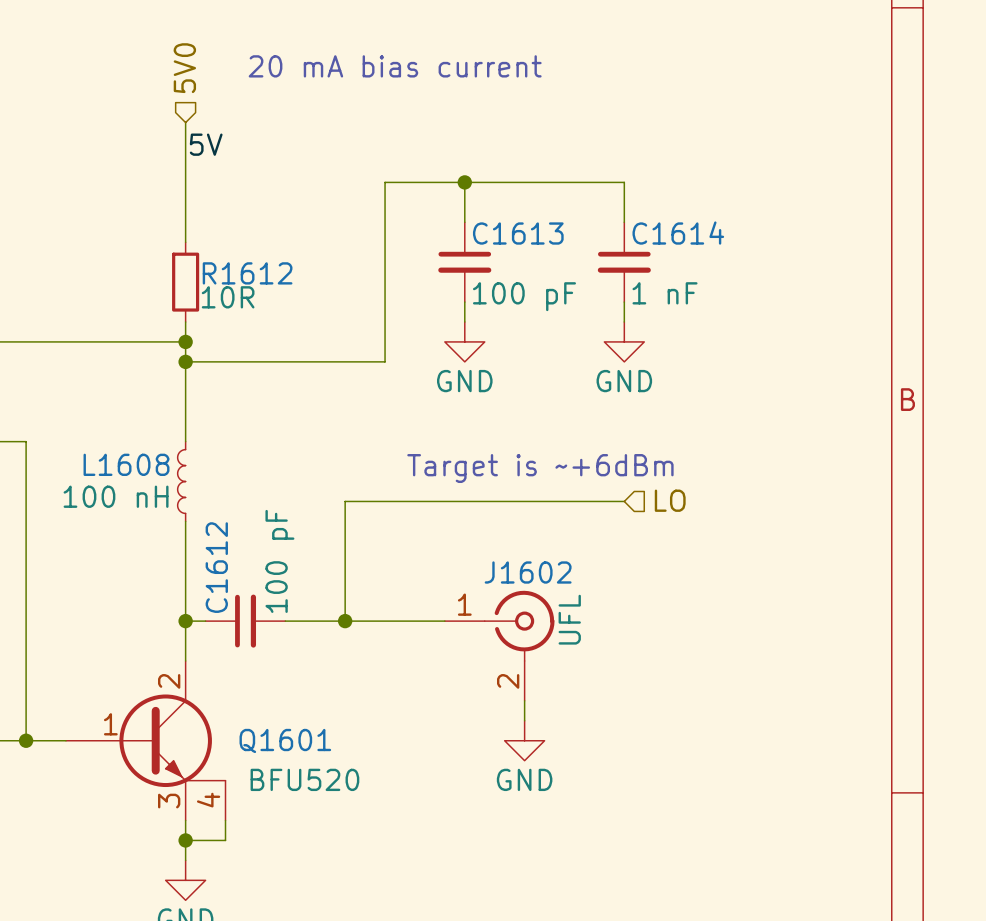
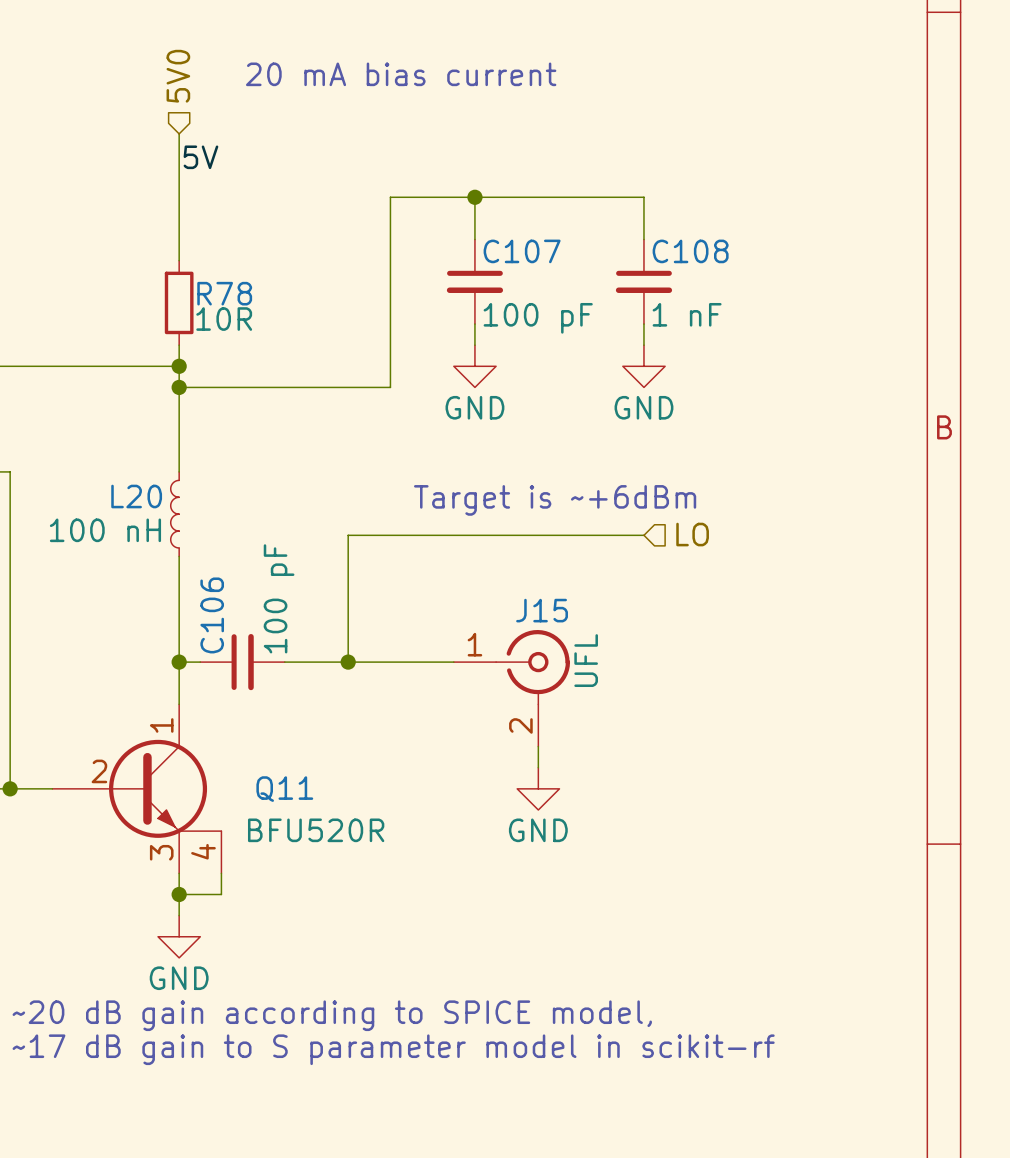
C1613 name: C1613 (518, 233) -> C107 (522, 251)
C1614 name: C1614 (678, 233) -> C108 (690, 251)
R1612 name: R1612 (247, 273) -> R78 (224, 293)
L1608 name: L1608 (126, 464) -> L20 (136, 496)
C1612 name: C1612 (216, 567) -> C106 (212, 615)
J1602 name: J1602 (528, 572) -> J15 (542, 610)
Q1601 pin number: 2 (169, 681) -> 1 (161, 725)
Q1601 pin number: 1 (110, 724) -> 2 (99, 771)
Q1601 name: Q1601 (285, 740) -> Q11 (284, 789)
Q1601 value: BFU520 (304, 779) -> BFU520R (316, 830)

